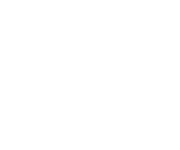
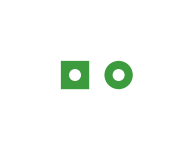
part: none -> (96, 75)

